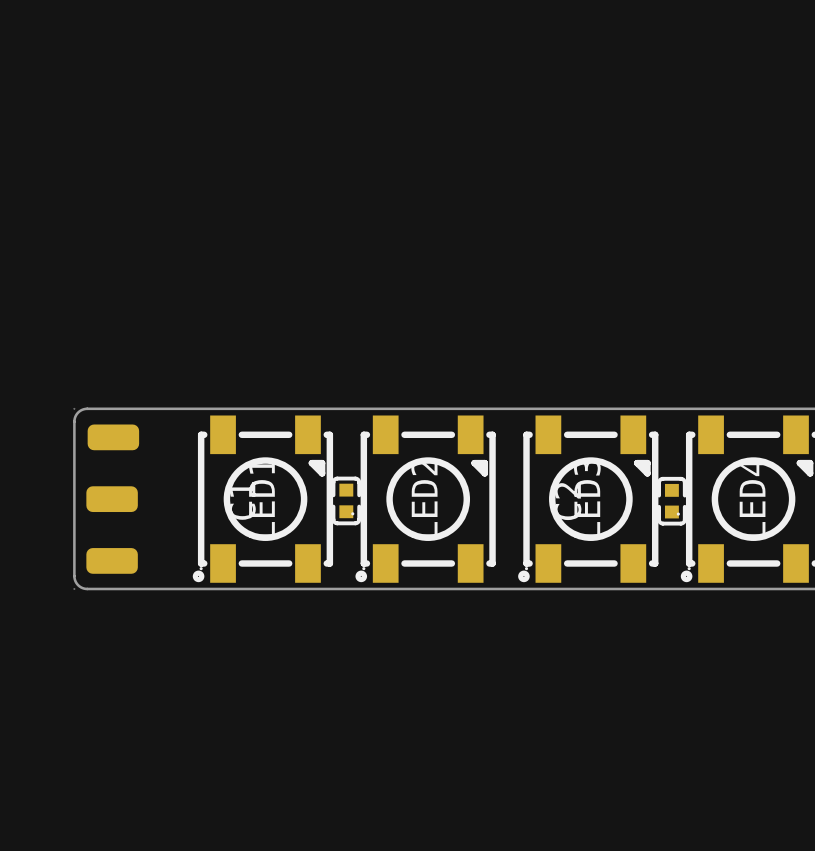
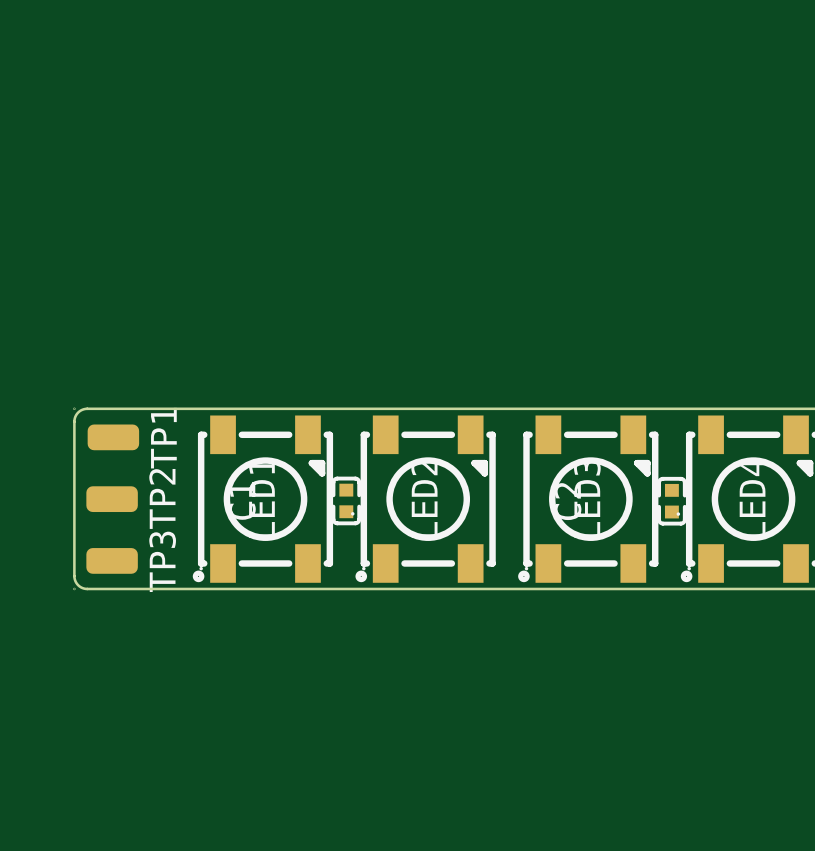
TP1 name: none -> TP1 (163, 438)
TP2 name: none -> TP2 (162, 498)
TP3 name: none -> TP3 (162, 561)

